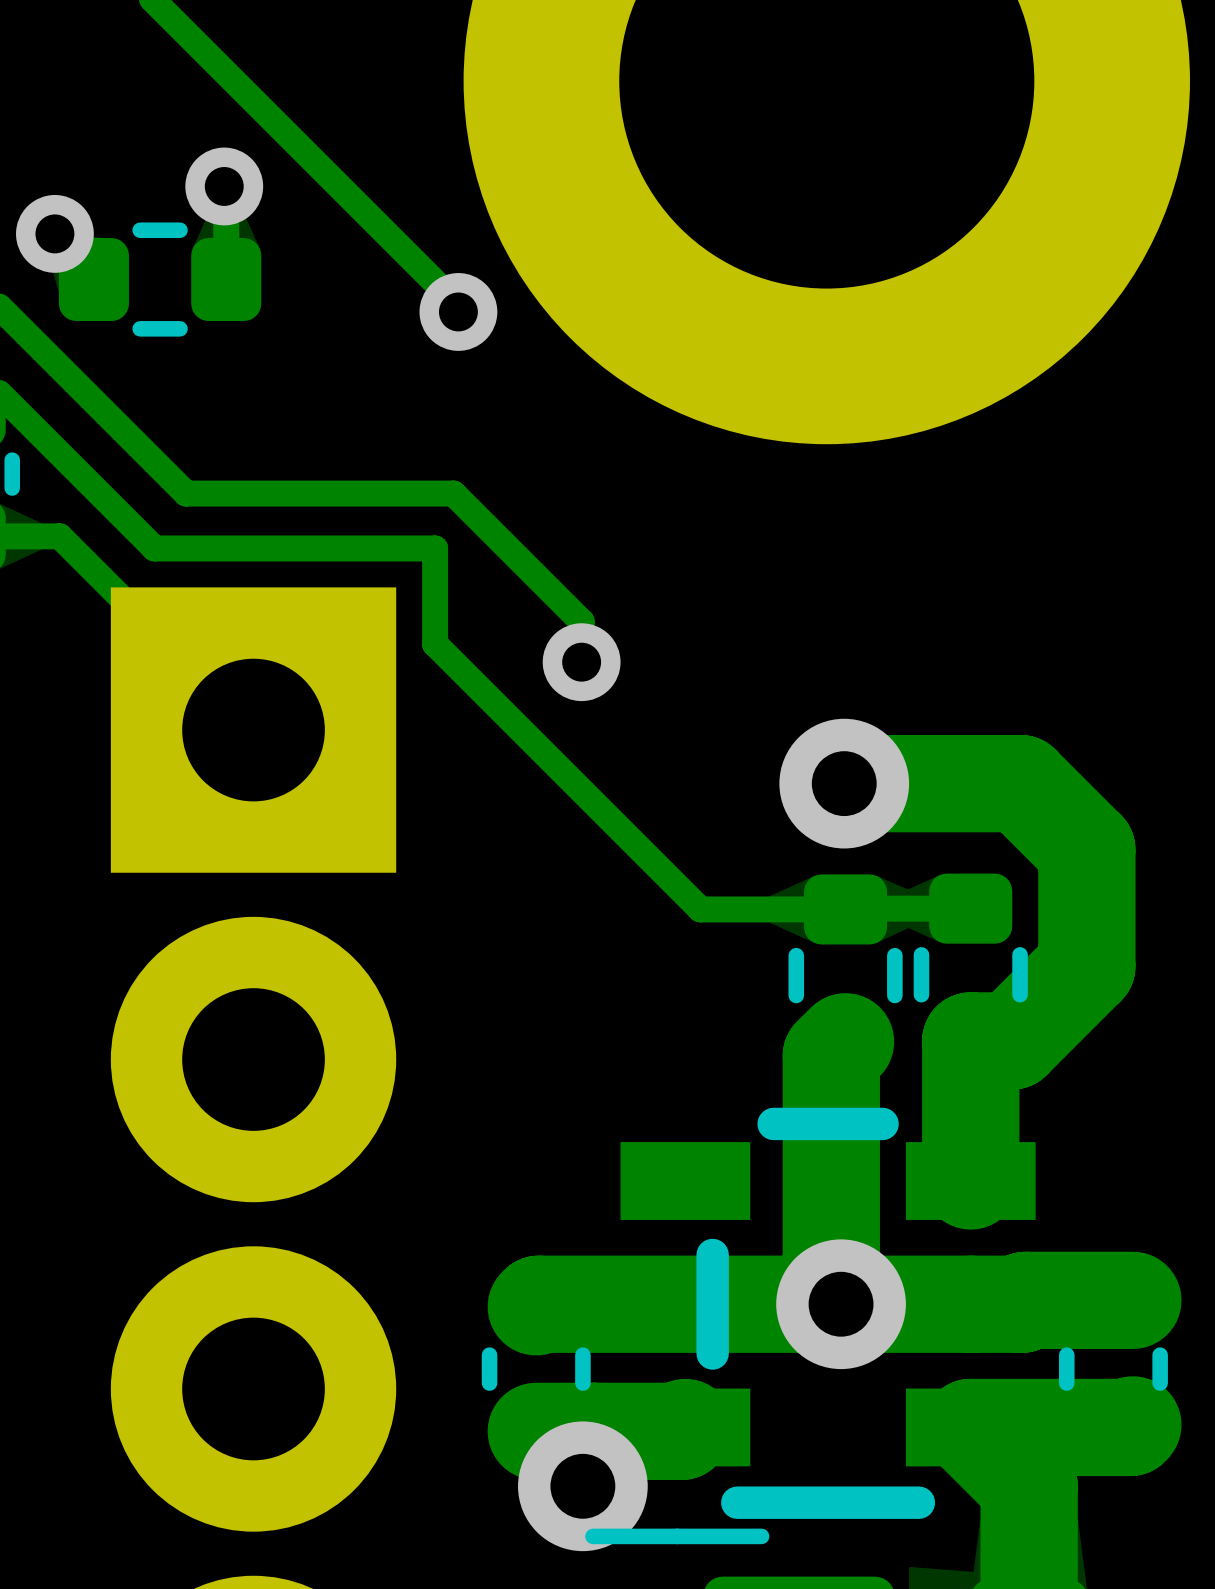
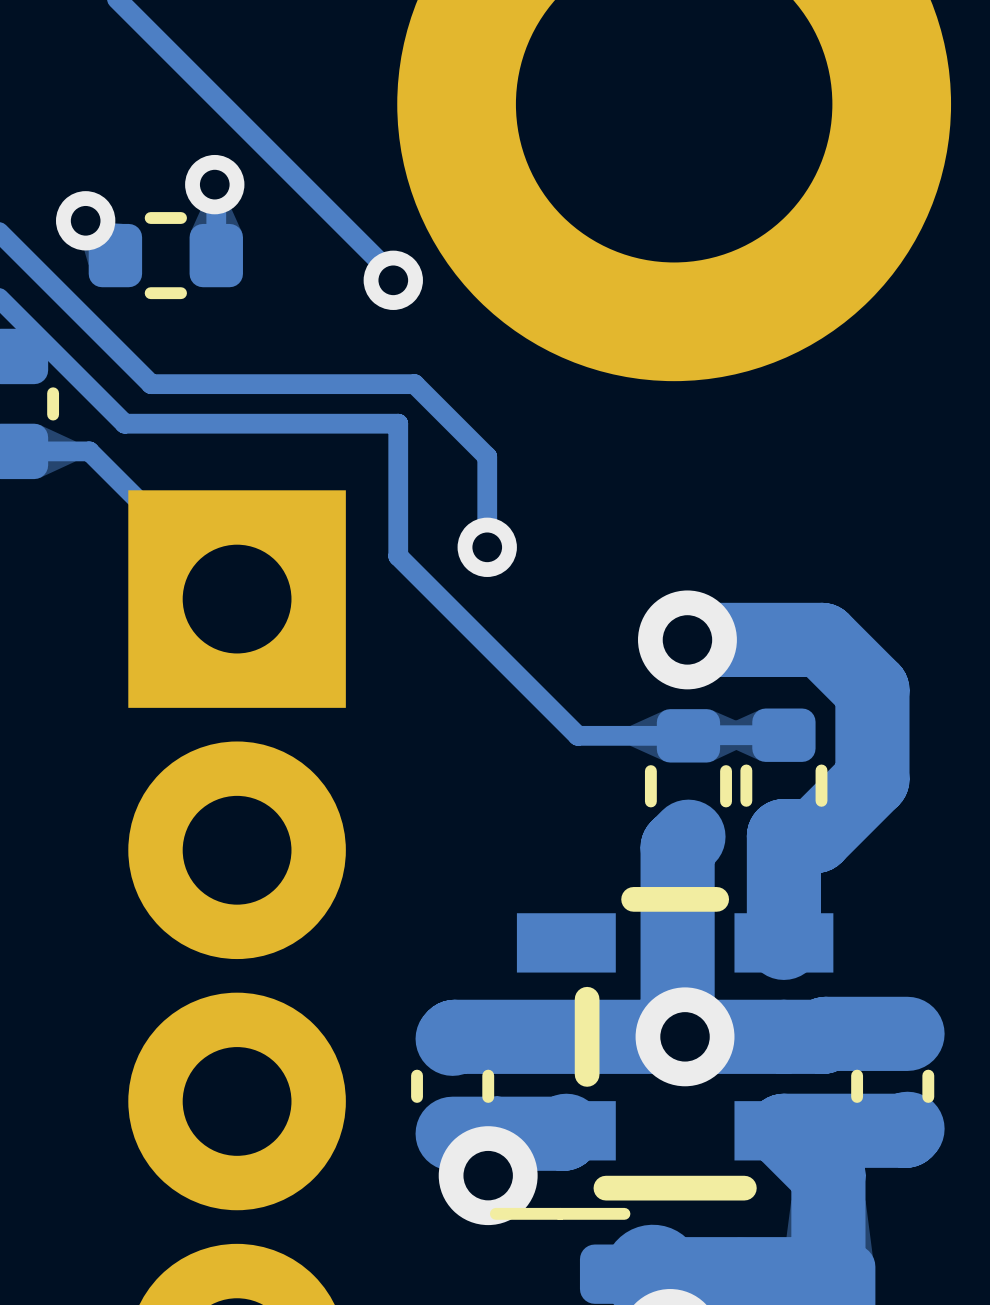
track: (140, 448) (186, 493) (453, 493) (581, 621) -> (151, 384) (414, 384) (487, 456) (487, 516)
track: (106, 500) (154, 548) (435, 548) (435, 644) (464, 673) -> (124, 423) (398, 423) (398, 556)

